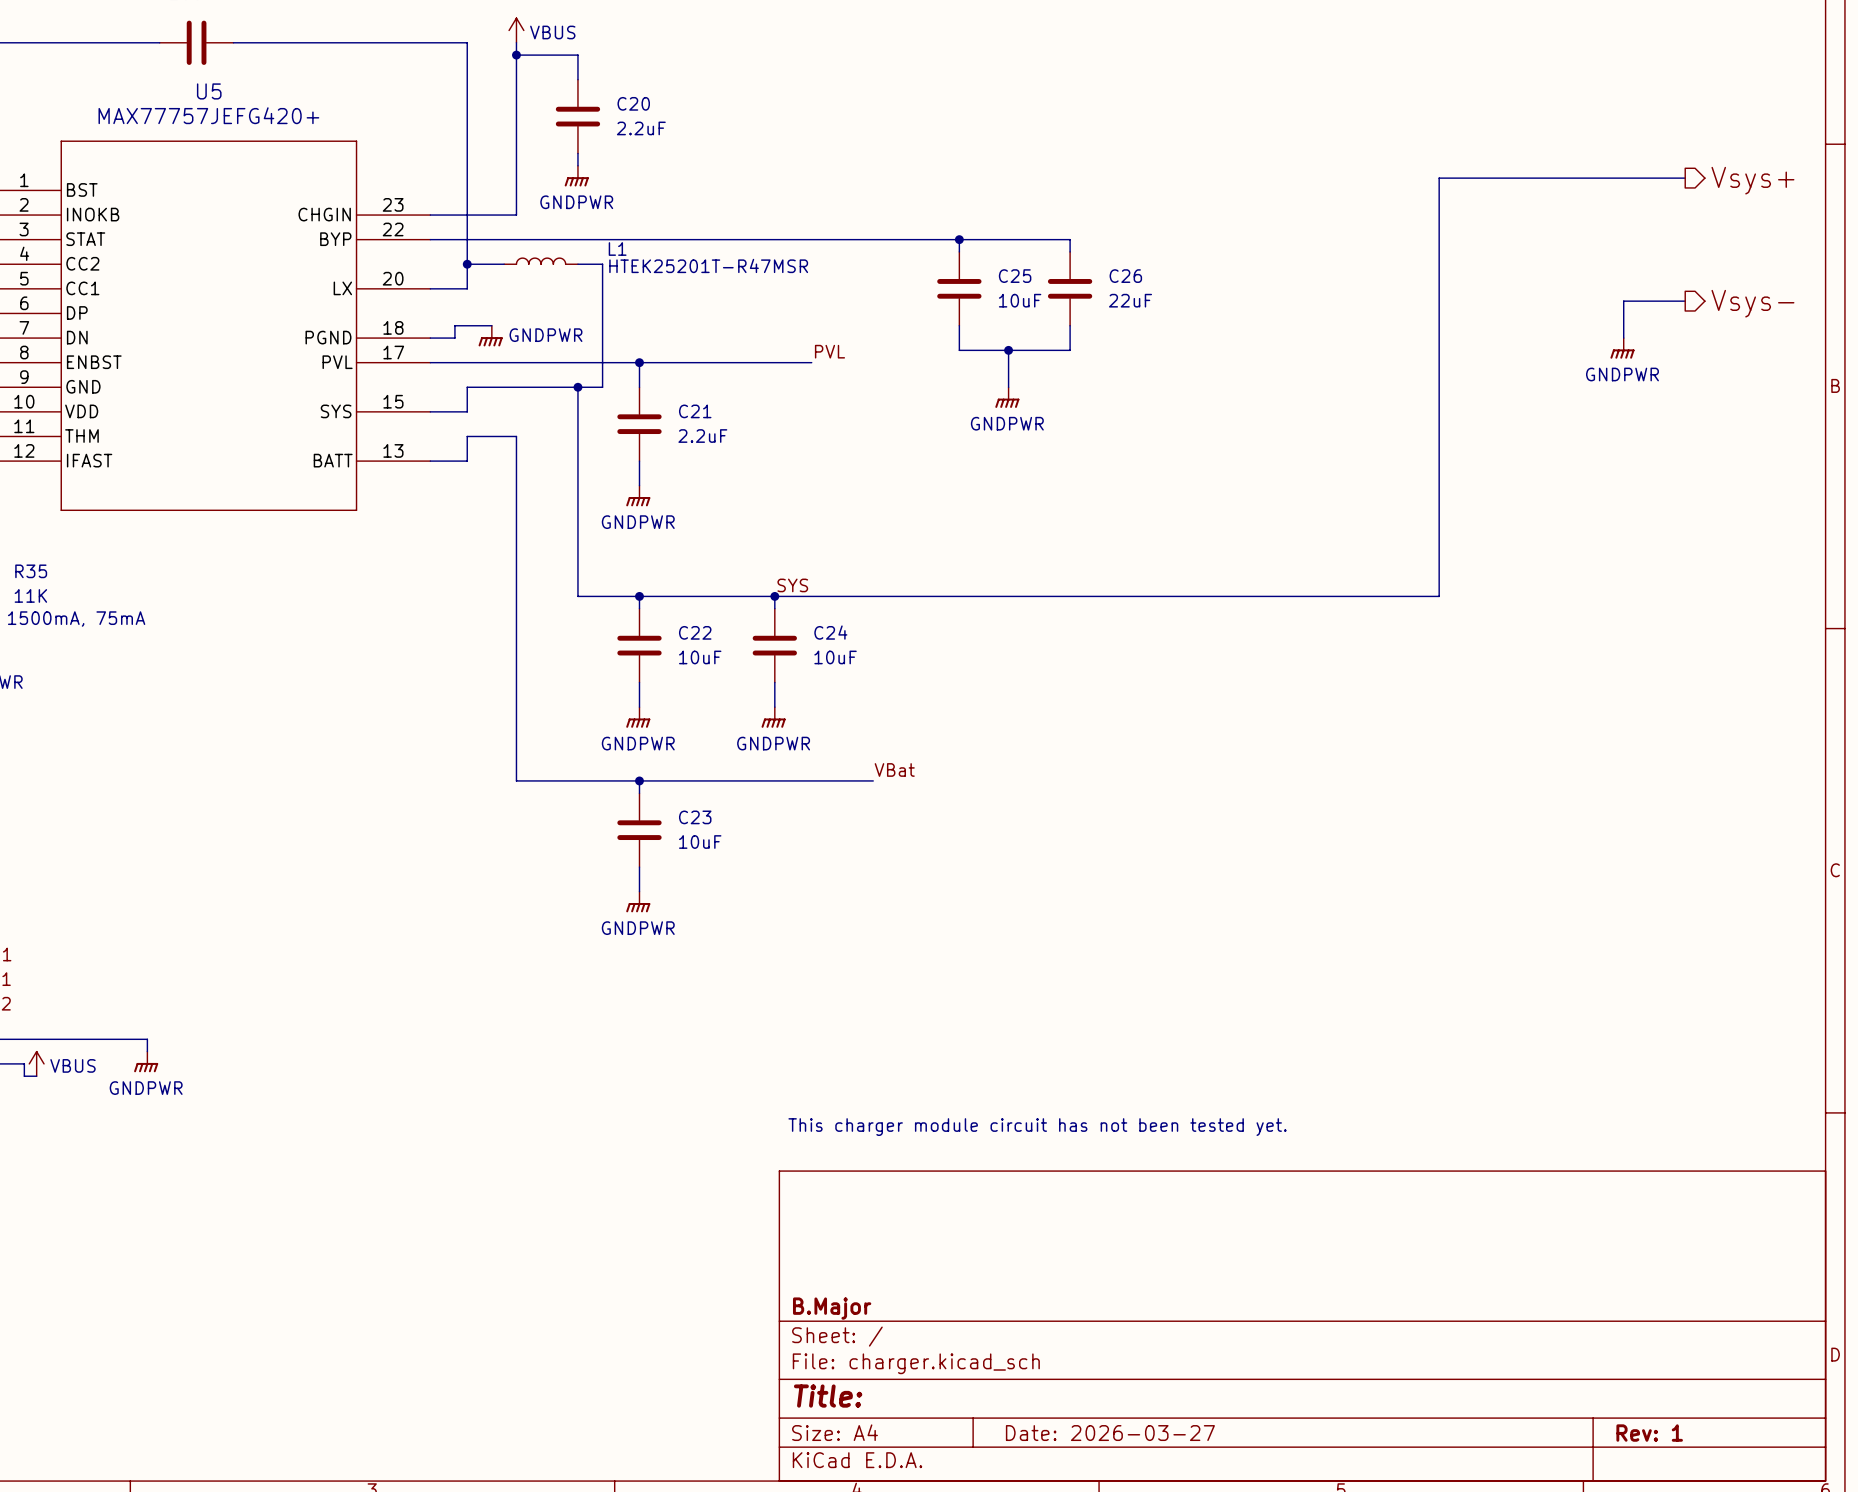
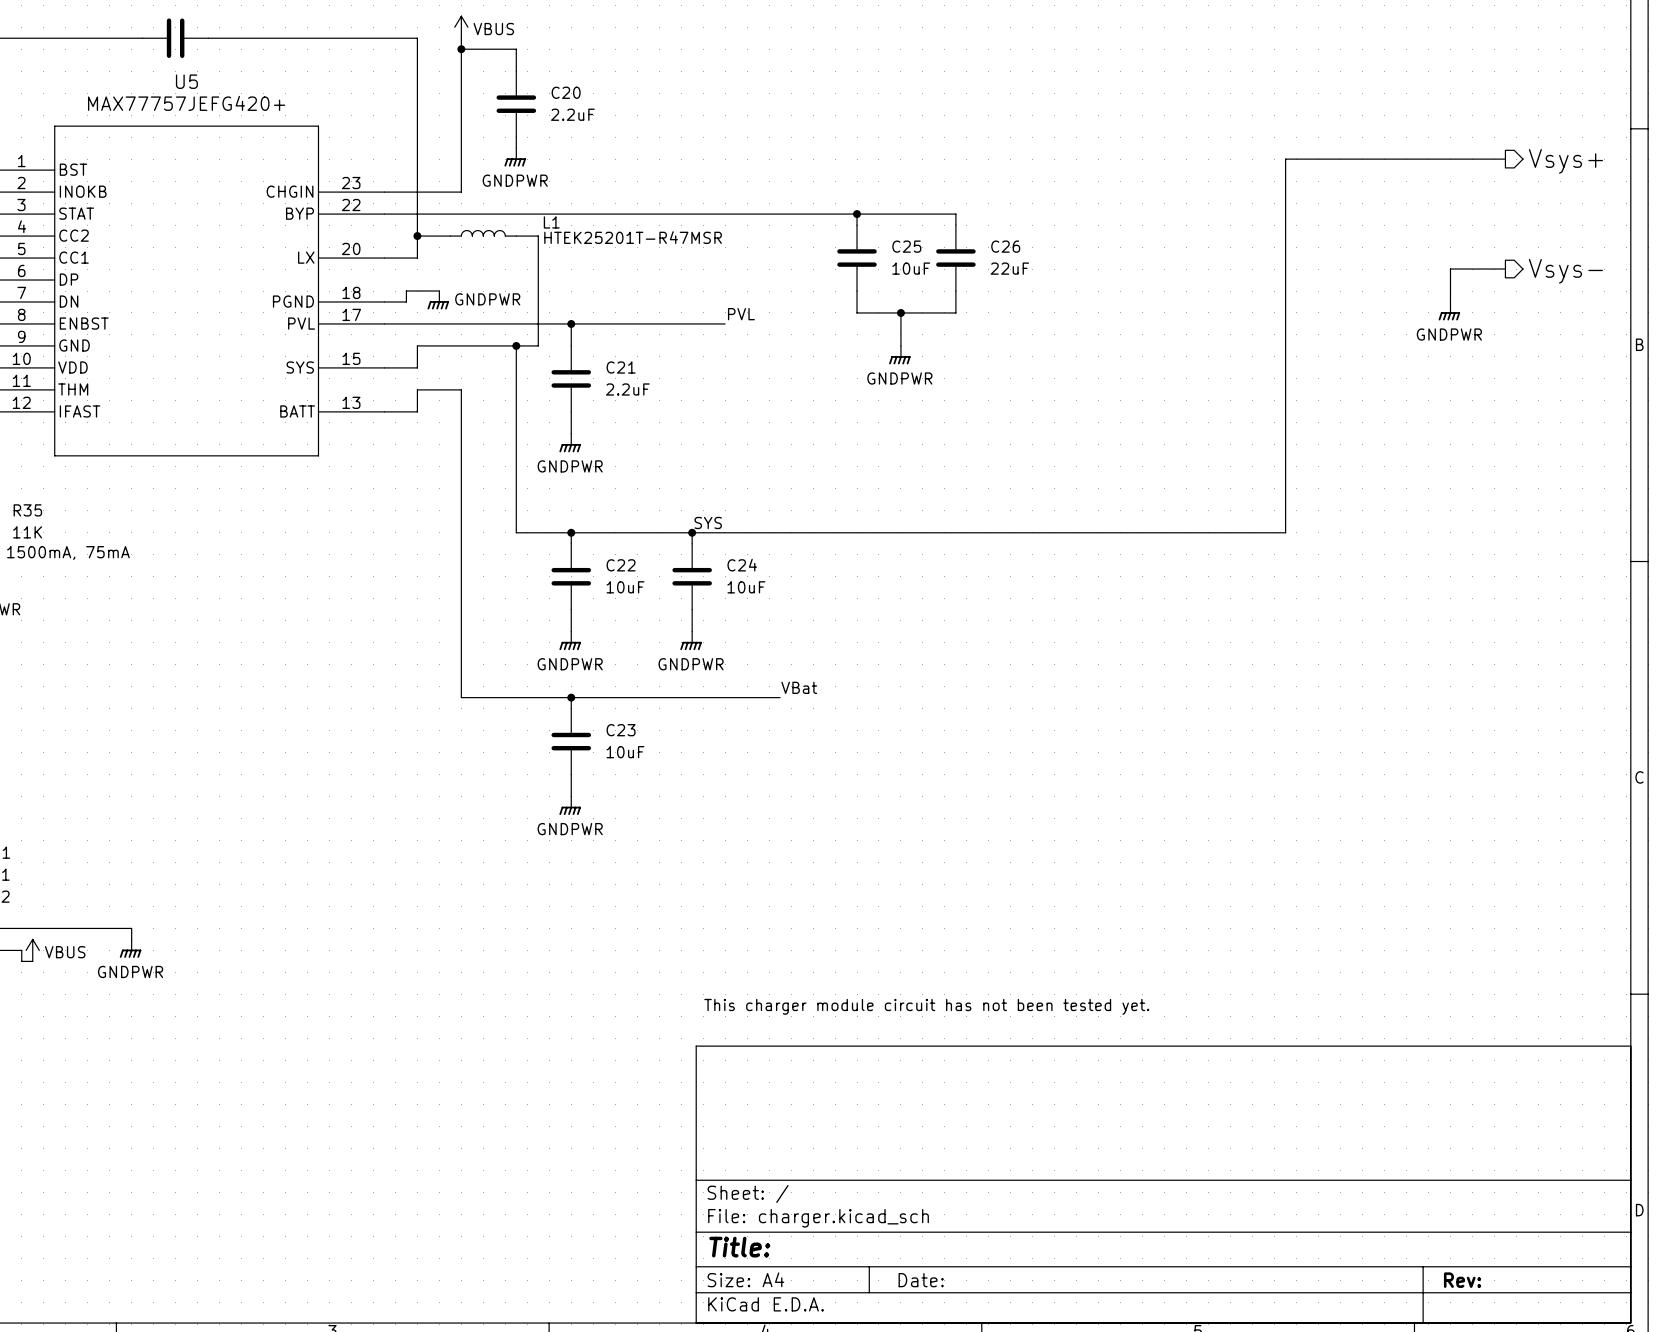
title block: B.Major (832, 1308) -> none
title block: Date: 2026-03-27 (1110, 1433) -> Date: (921, 1280)
title block: Rev: 1 (1649, 1433) -> Rev: (1462, 1280)

